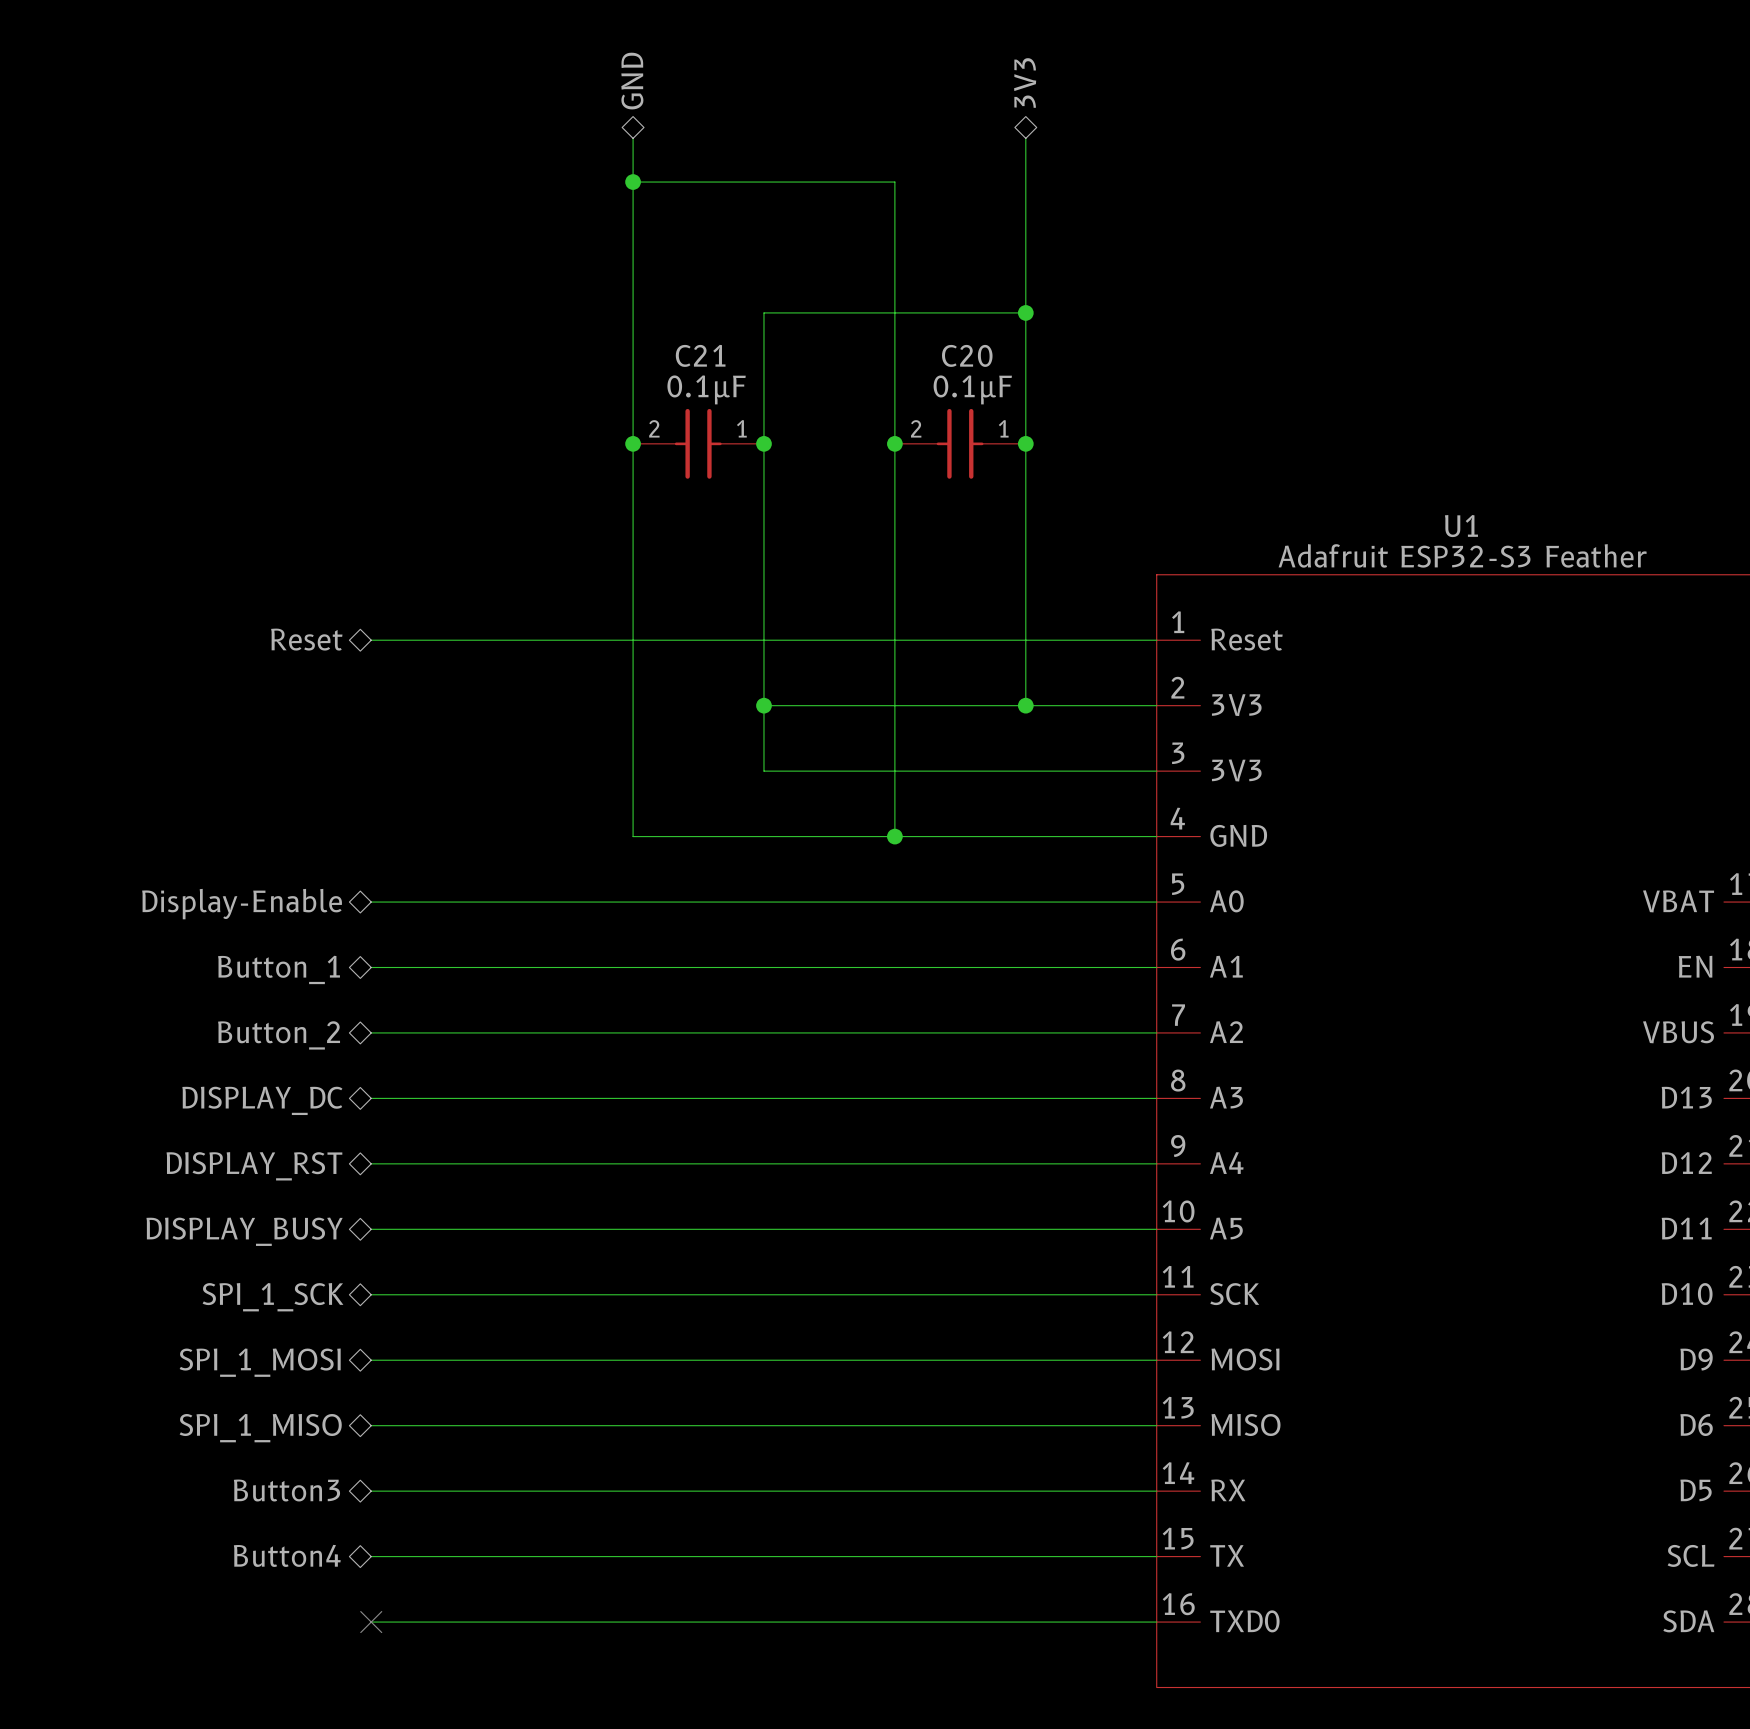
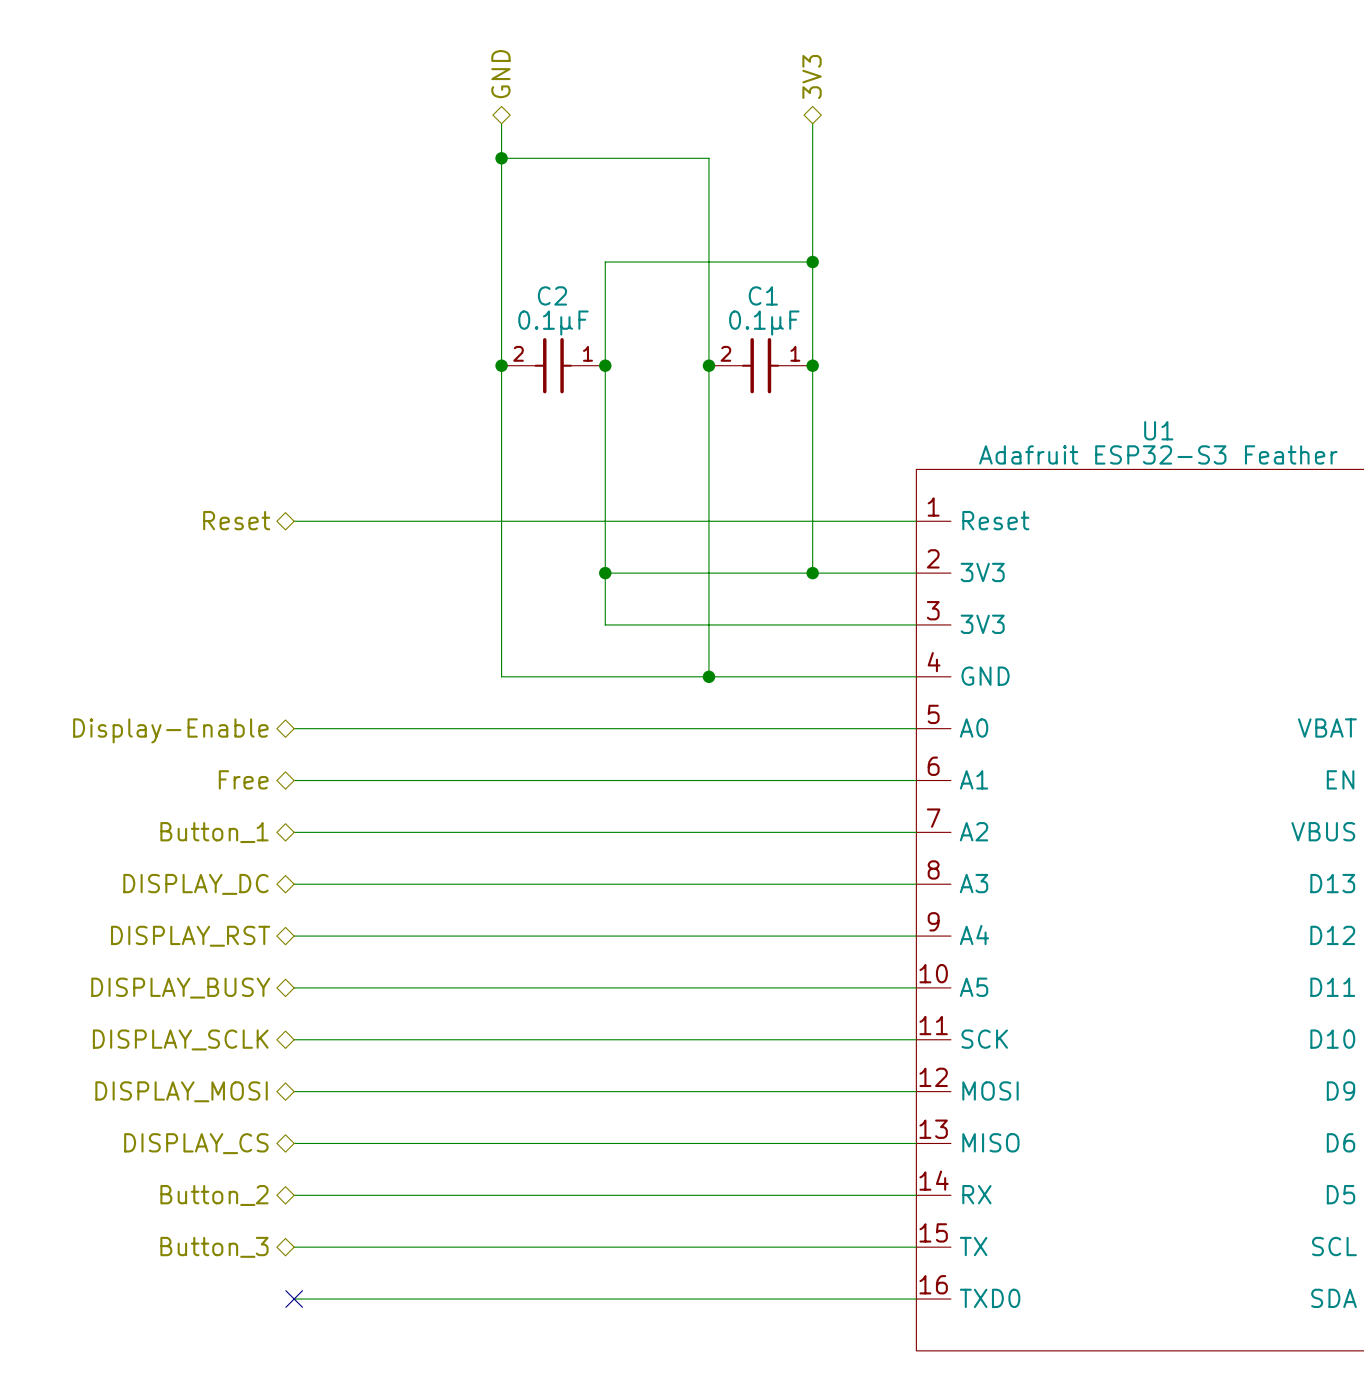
C21 name: C21 (700, 355) -> C2 (552, 295)
C20 name: C20 (967, 355) -> C1 (763, 295)
hierarchical label: Button_1 (279, 969) -> Free (243, 779)
hierarchical label: Button_2 (279, 1035) -> Button_1 (214, 832)
hierarchical label: SPI_1_SCK (273, 1297) -> DISPLAY_SCLK (180, 1039)
hierarchical label: SPI_1_MOSI (260, 1362) -> DISPLAY_MOSI (181, 1091)
hierarchical label: SPI_1_MISO (260, 1428) -> DISPLAY_CS (196, 1143)
hierarchical label: Button3 (286, 1490) -> Button_2 (214, 1195)
hierarchical label: Button4 (287, 1555) -> Button_3 (214, 1247)

